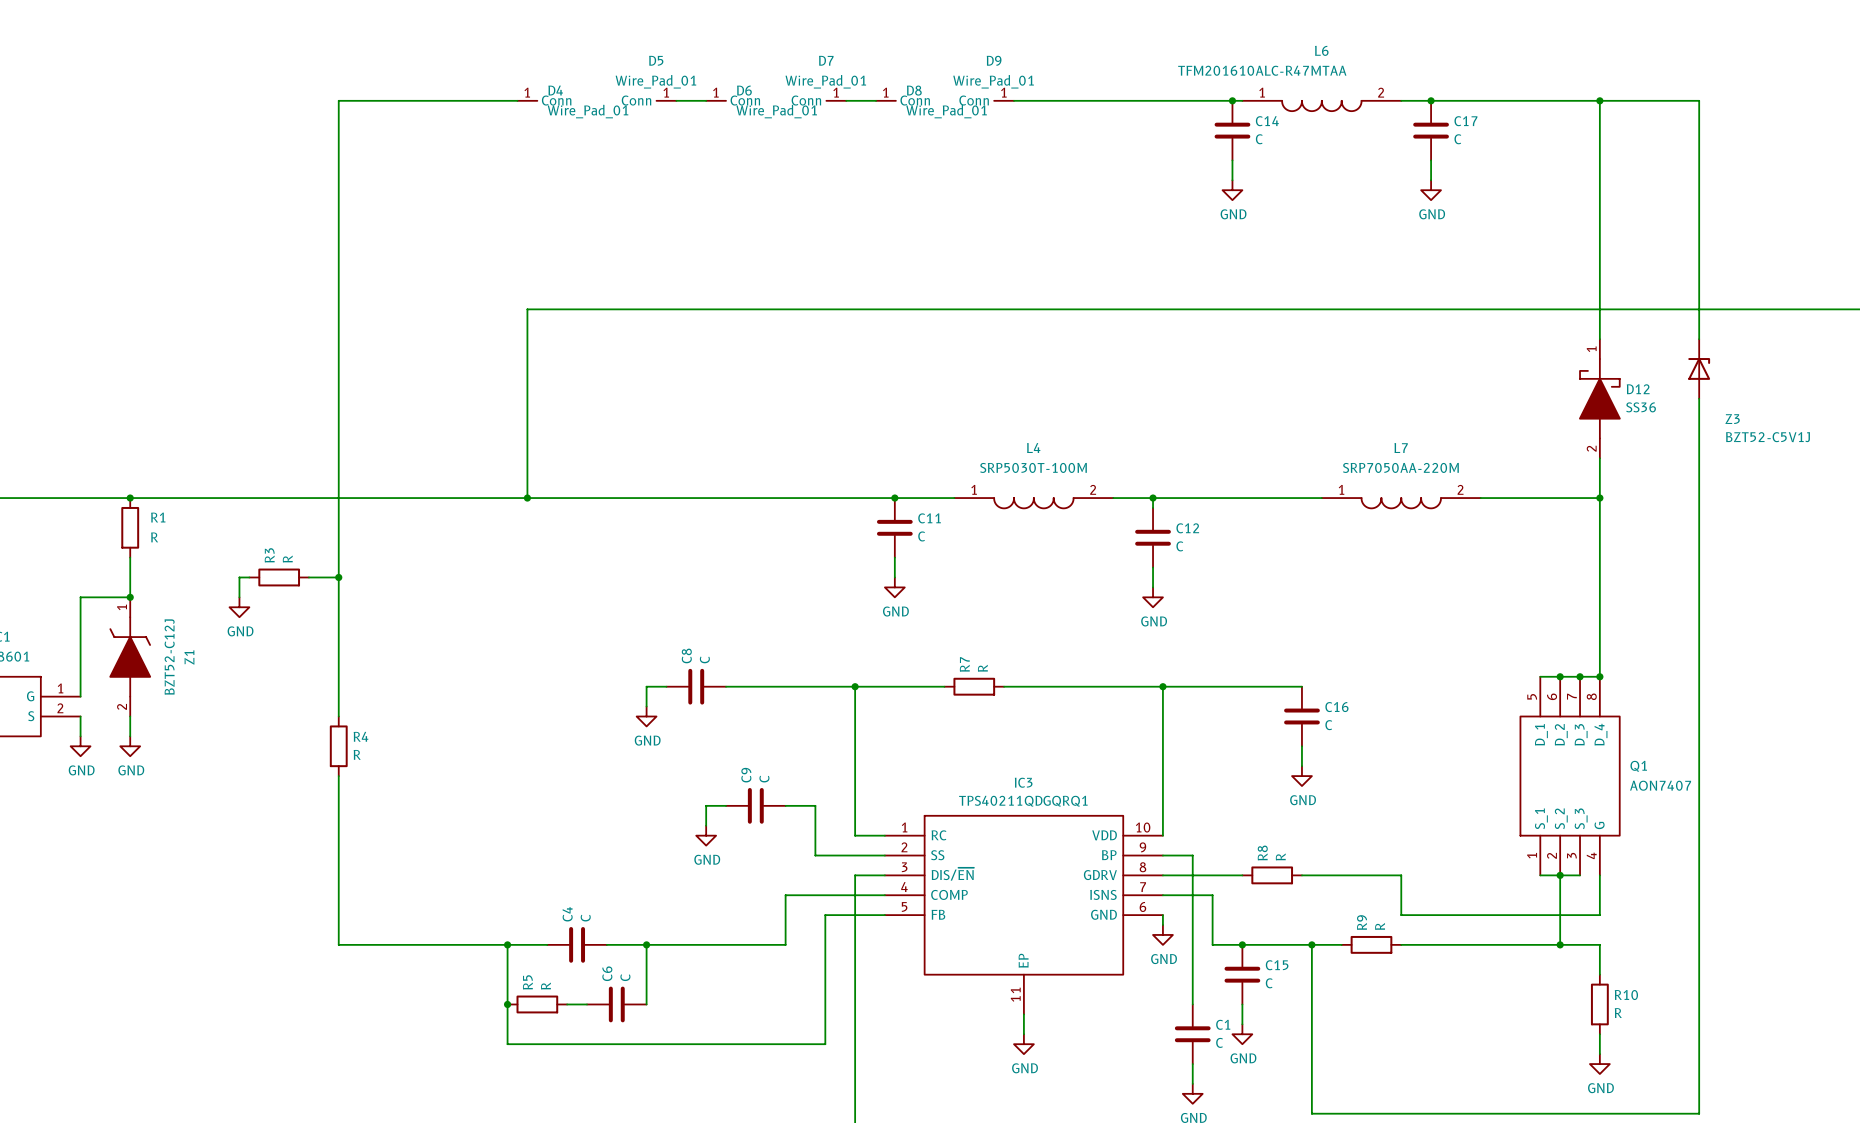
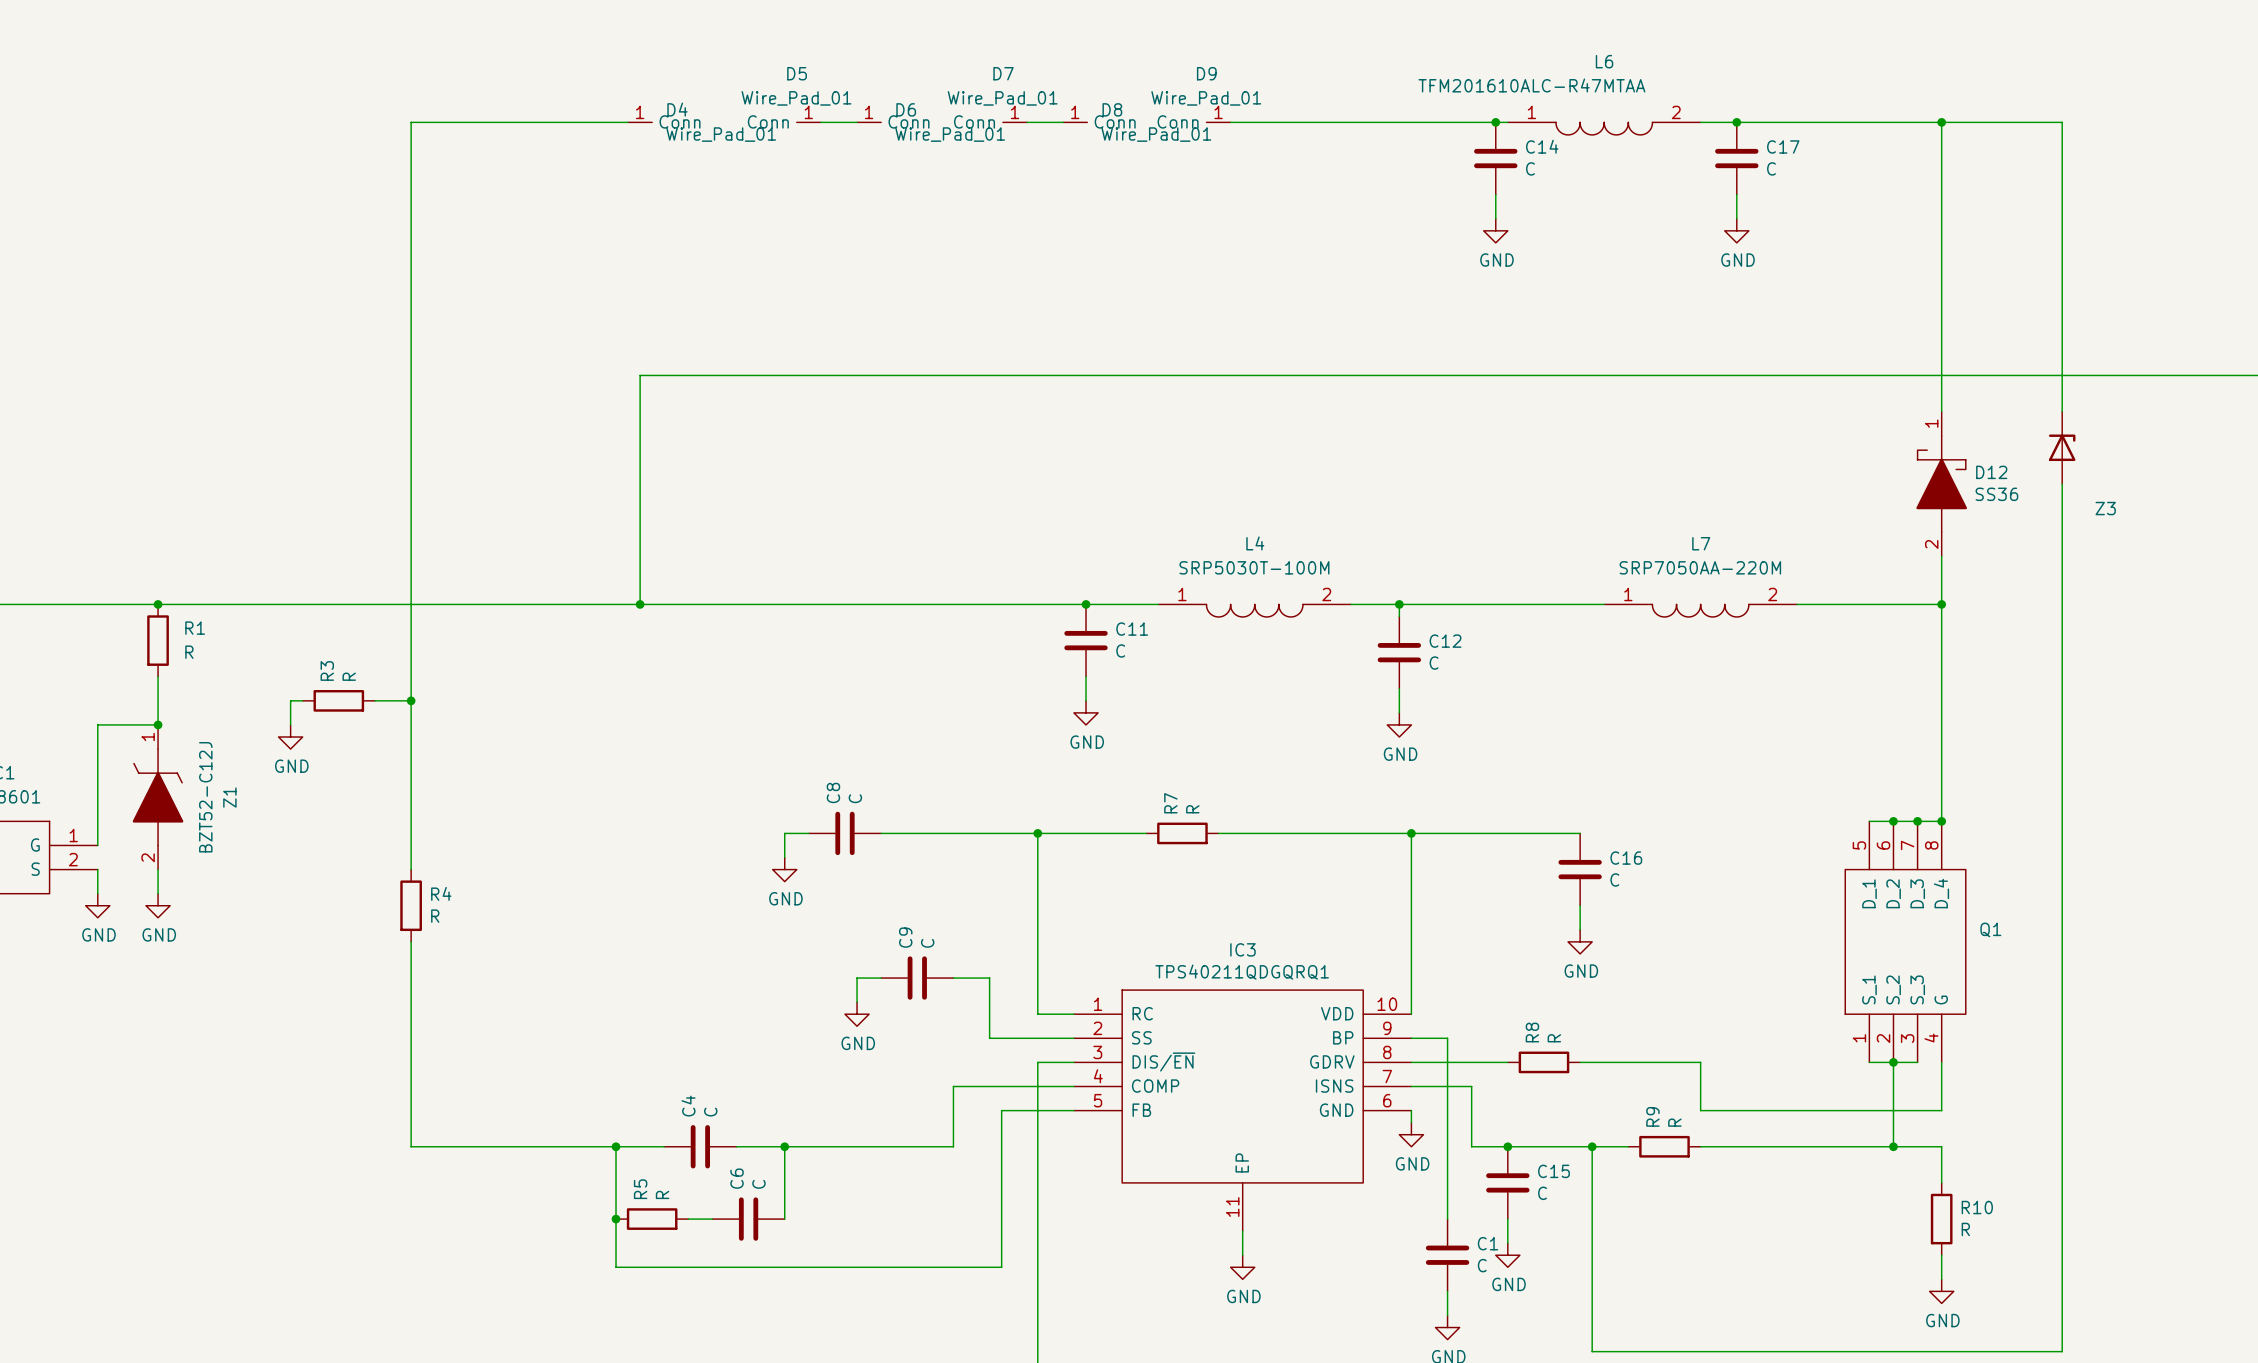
Z3 value: BZT52-C5V1J (1767, 437) -> none
Q1 value: AON7407 (1660, 785) -> none

